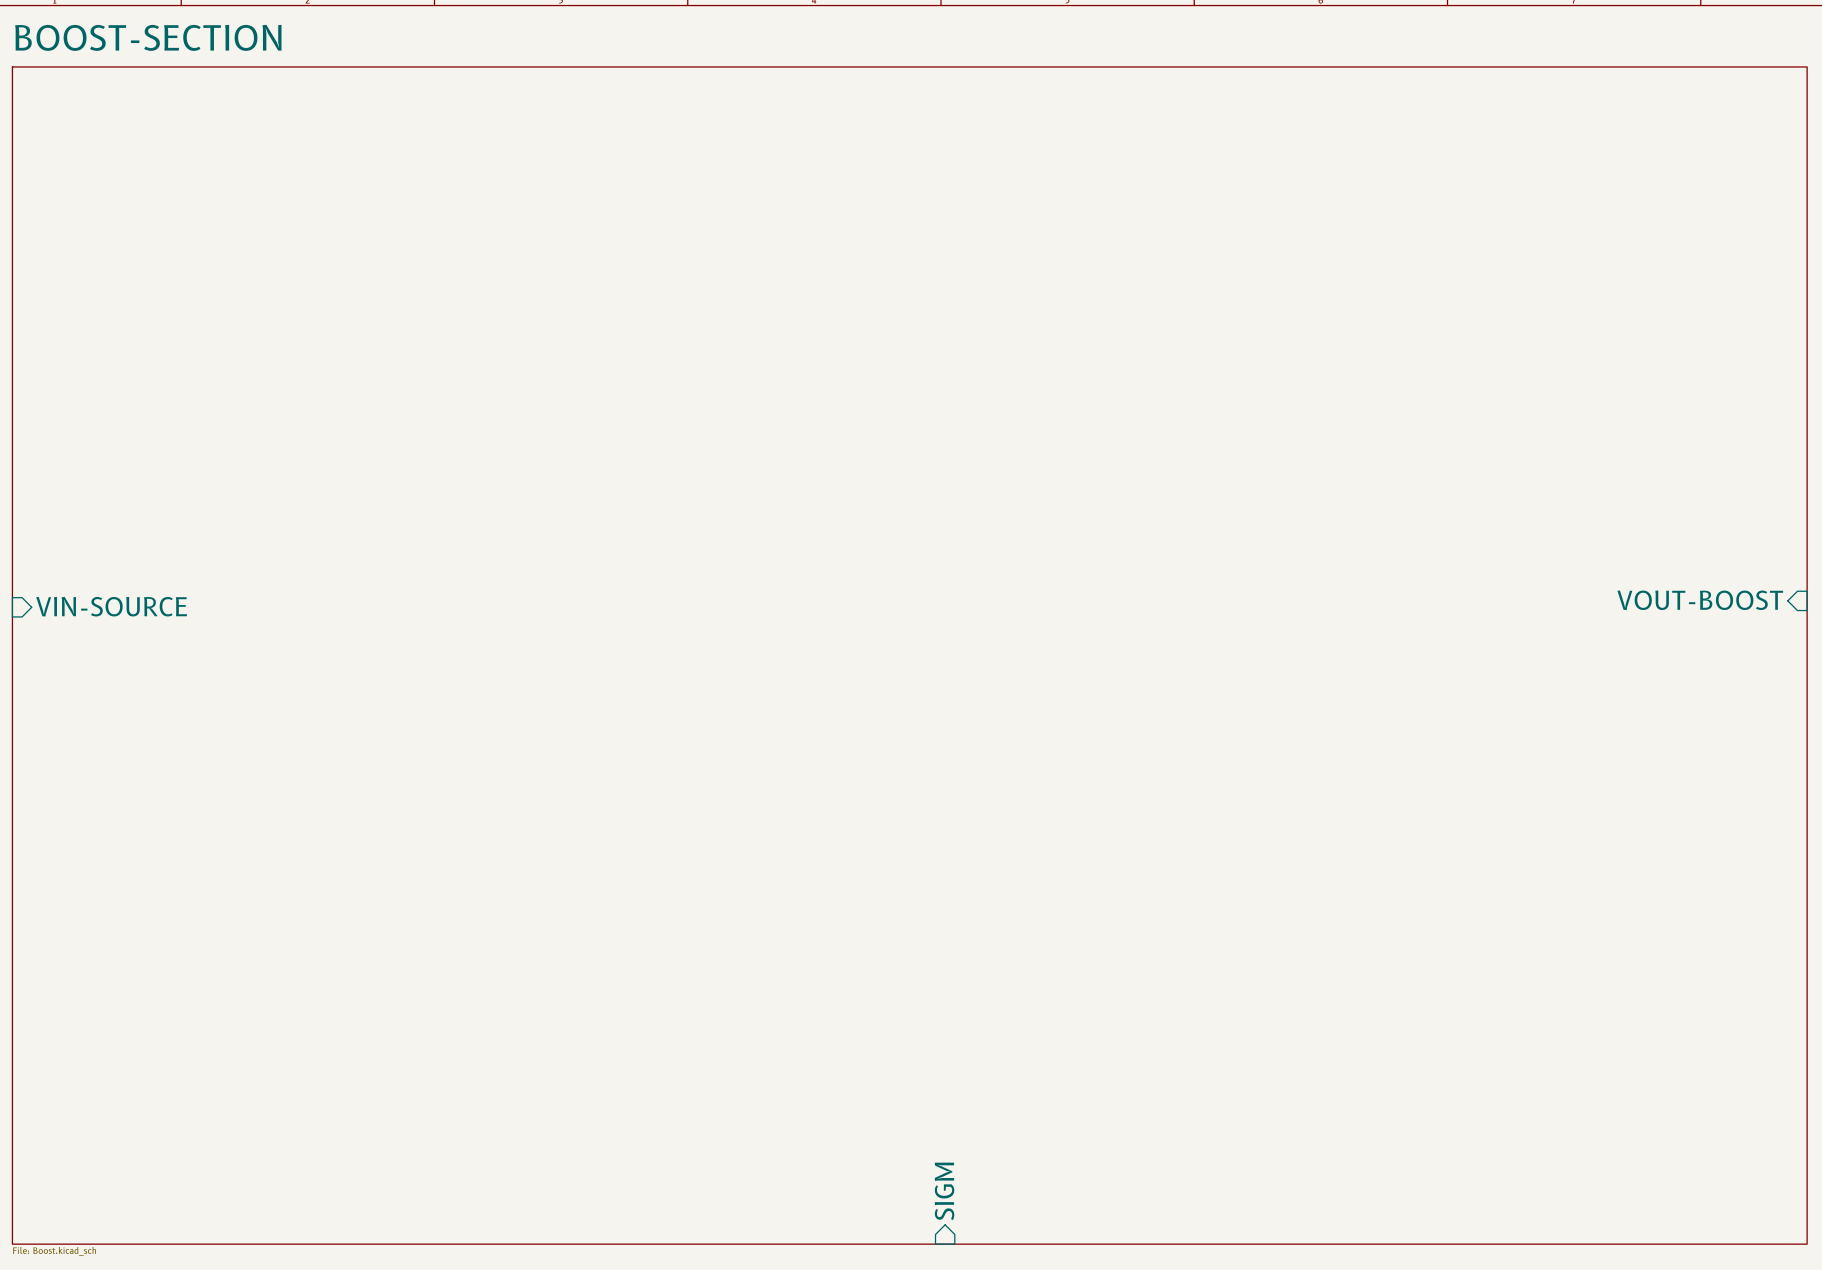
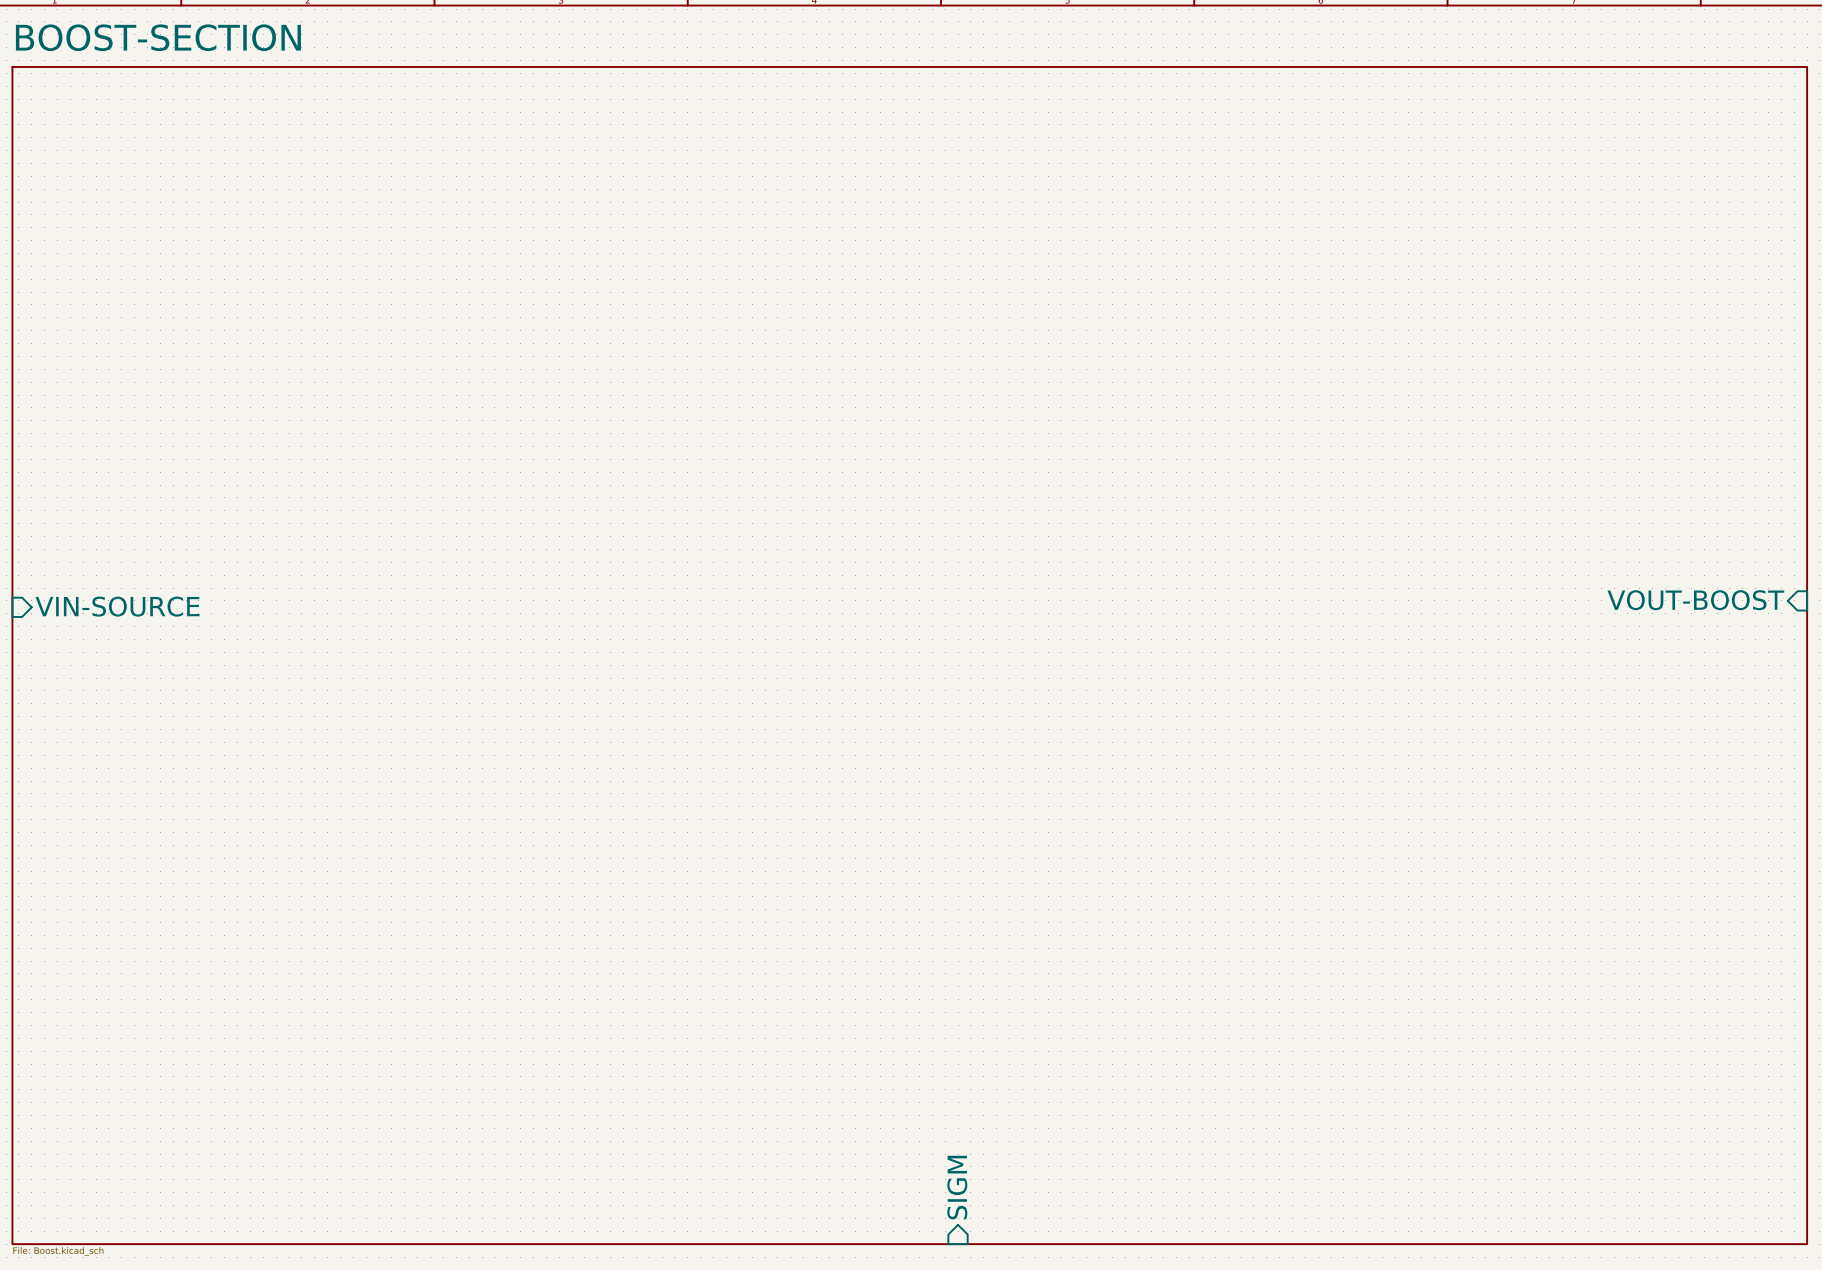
sheet pin position: SIGM (944, 1191) -> SIGM (957, 1187)

